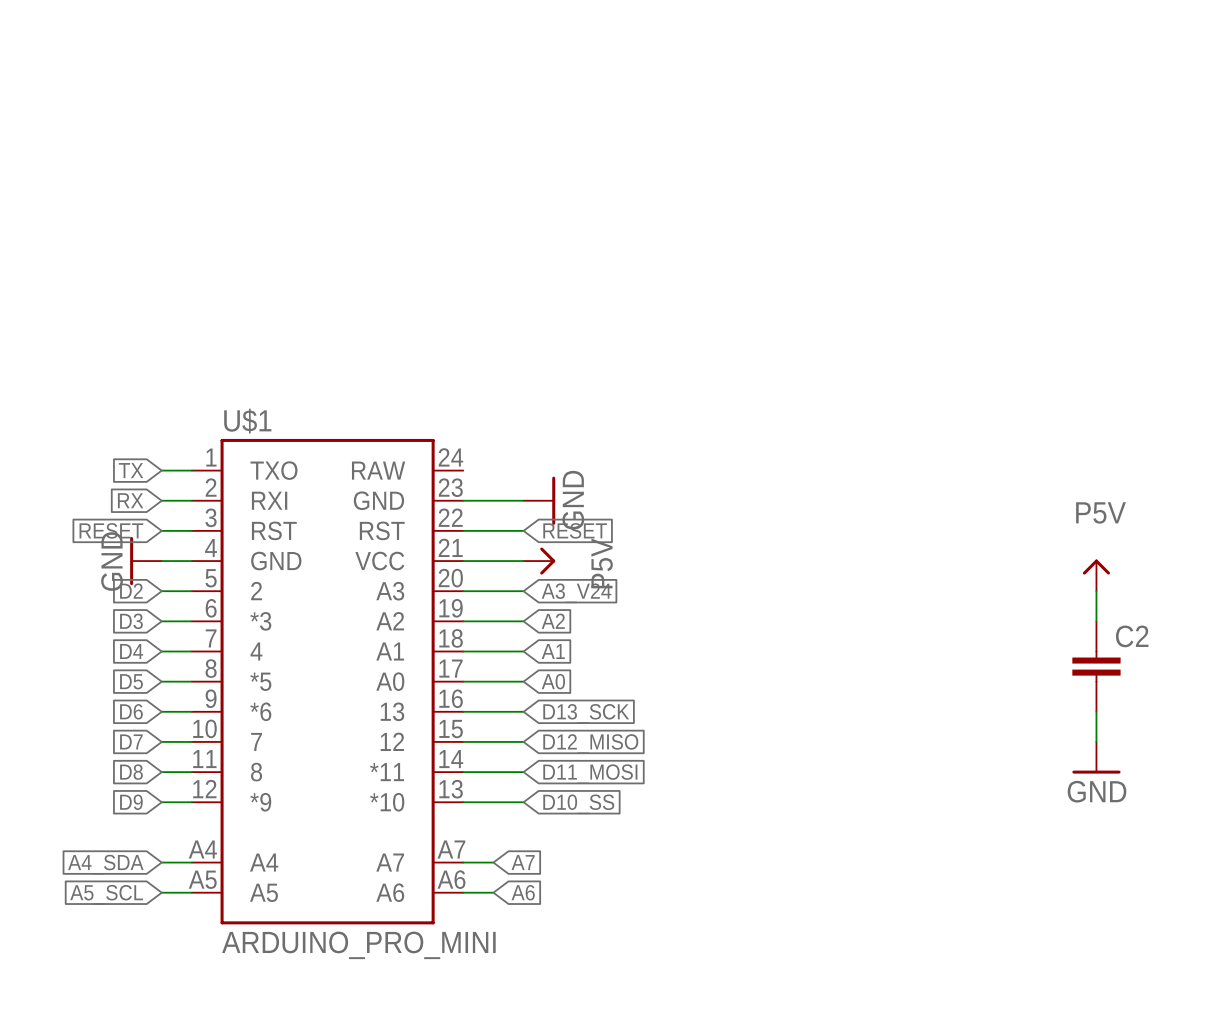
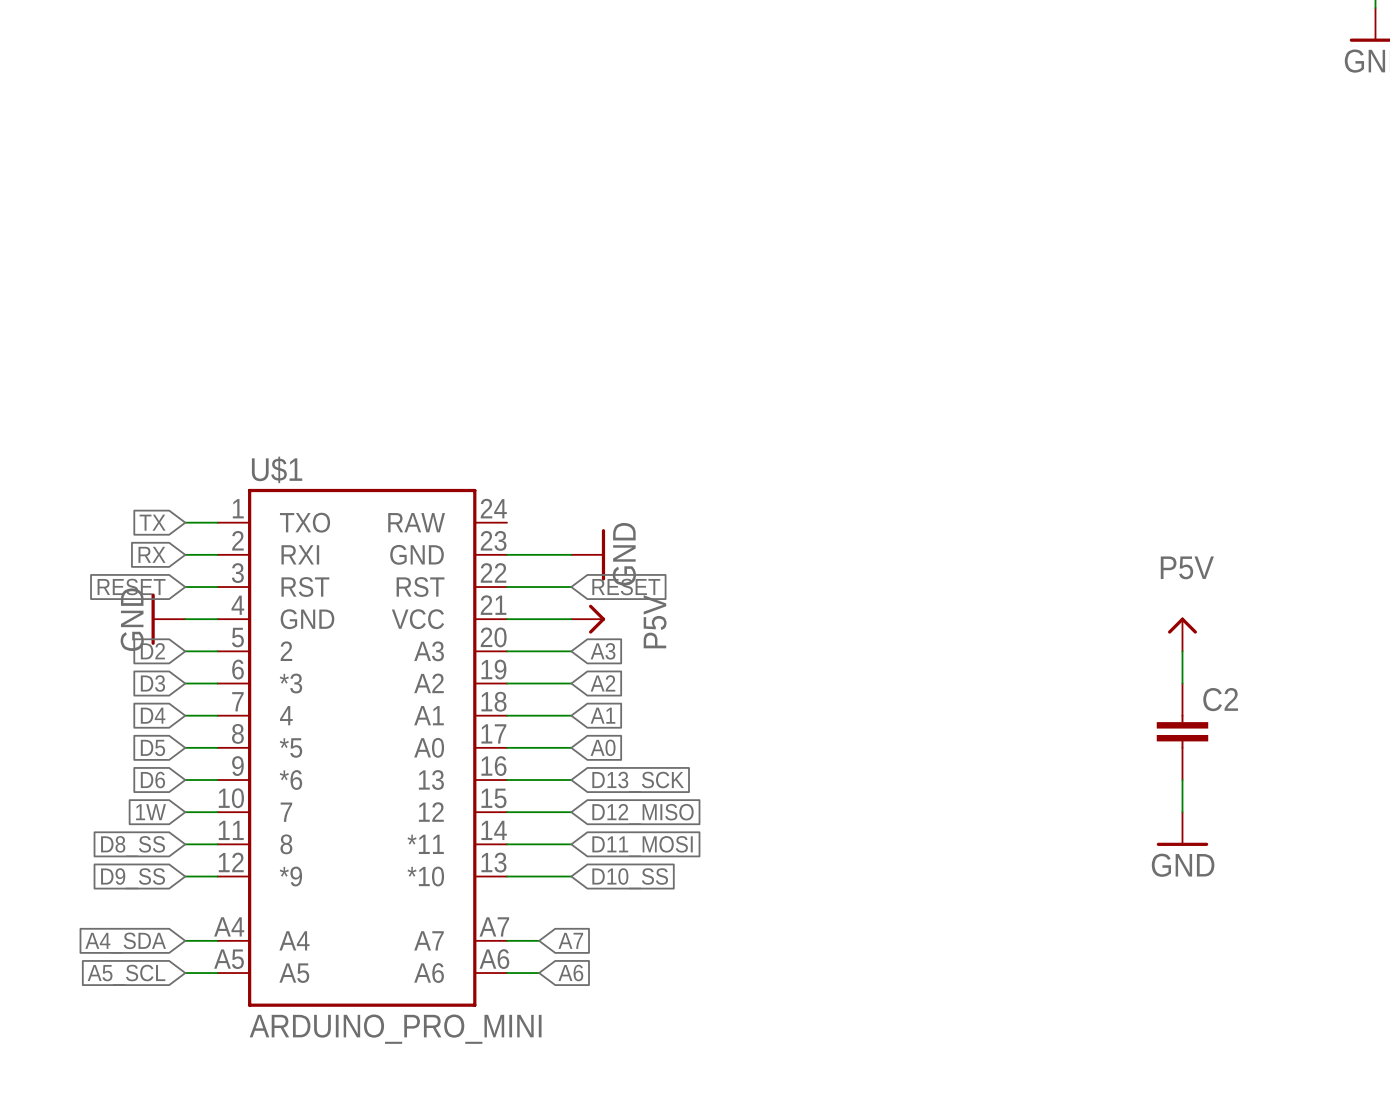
global label: A3_V24 (576, 593) -> A3 (603, 651)
global label: D7 (131, 741) -> 1W (150, 812)
global label: D8 (131, 772) -> D8_SS (133, 846)
global label: D9 (131, 802) -> D9_SS (133, 878)

